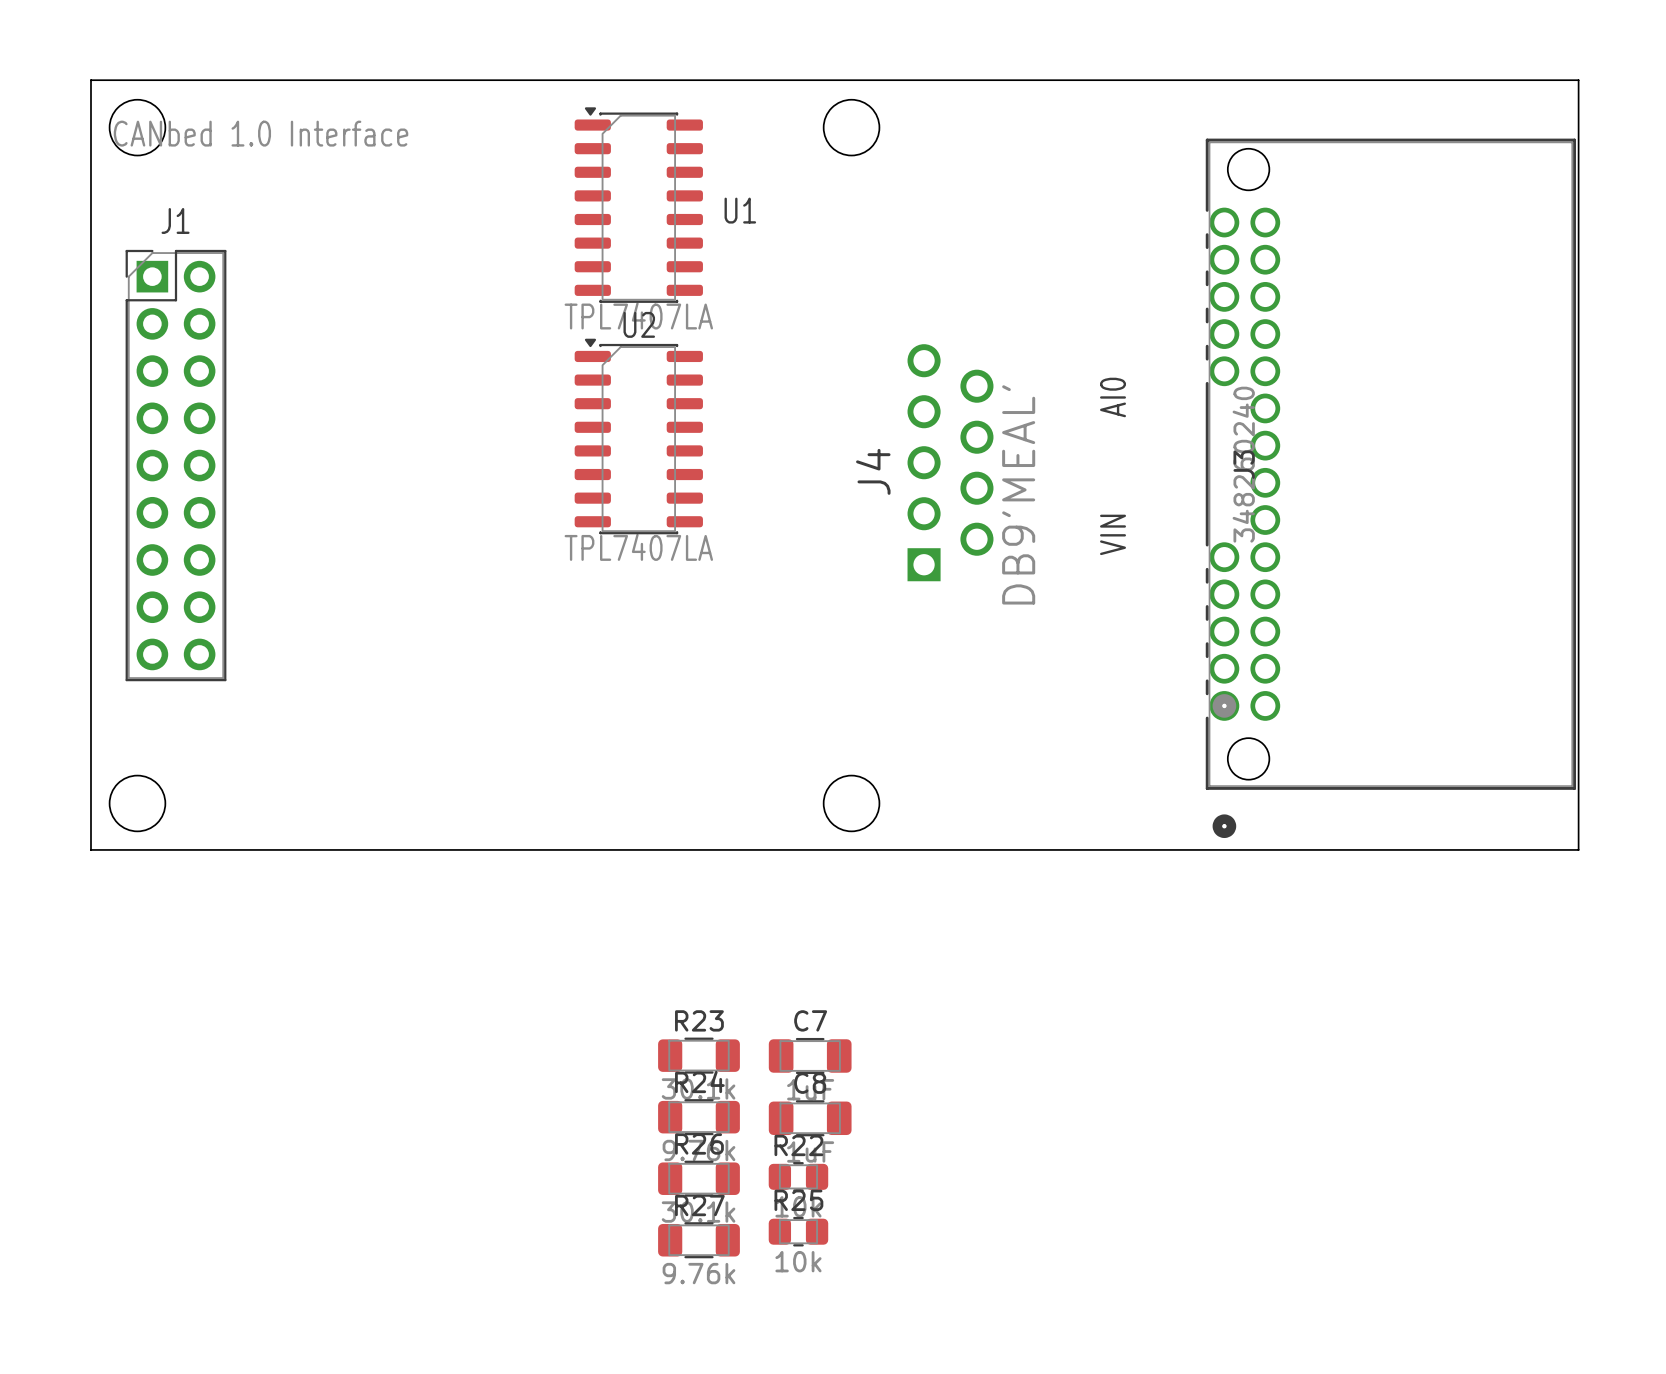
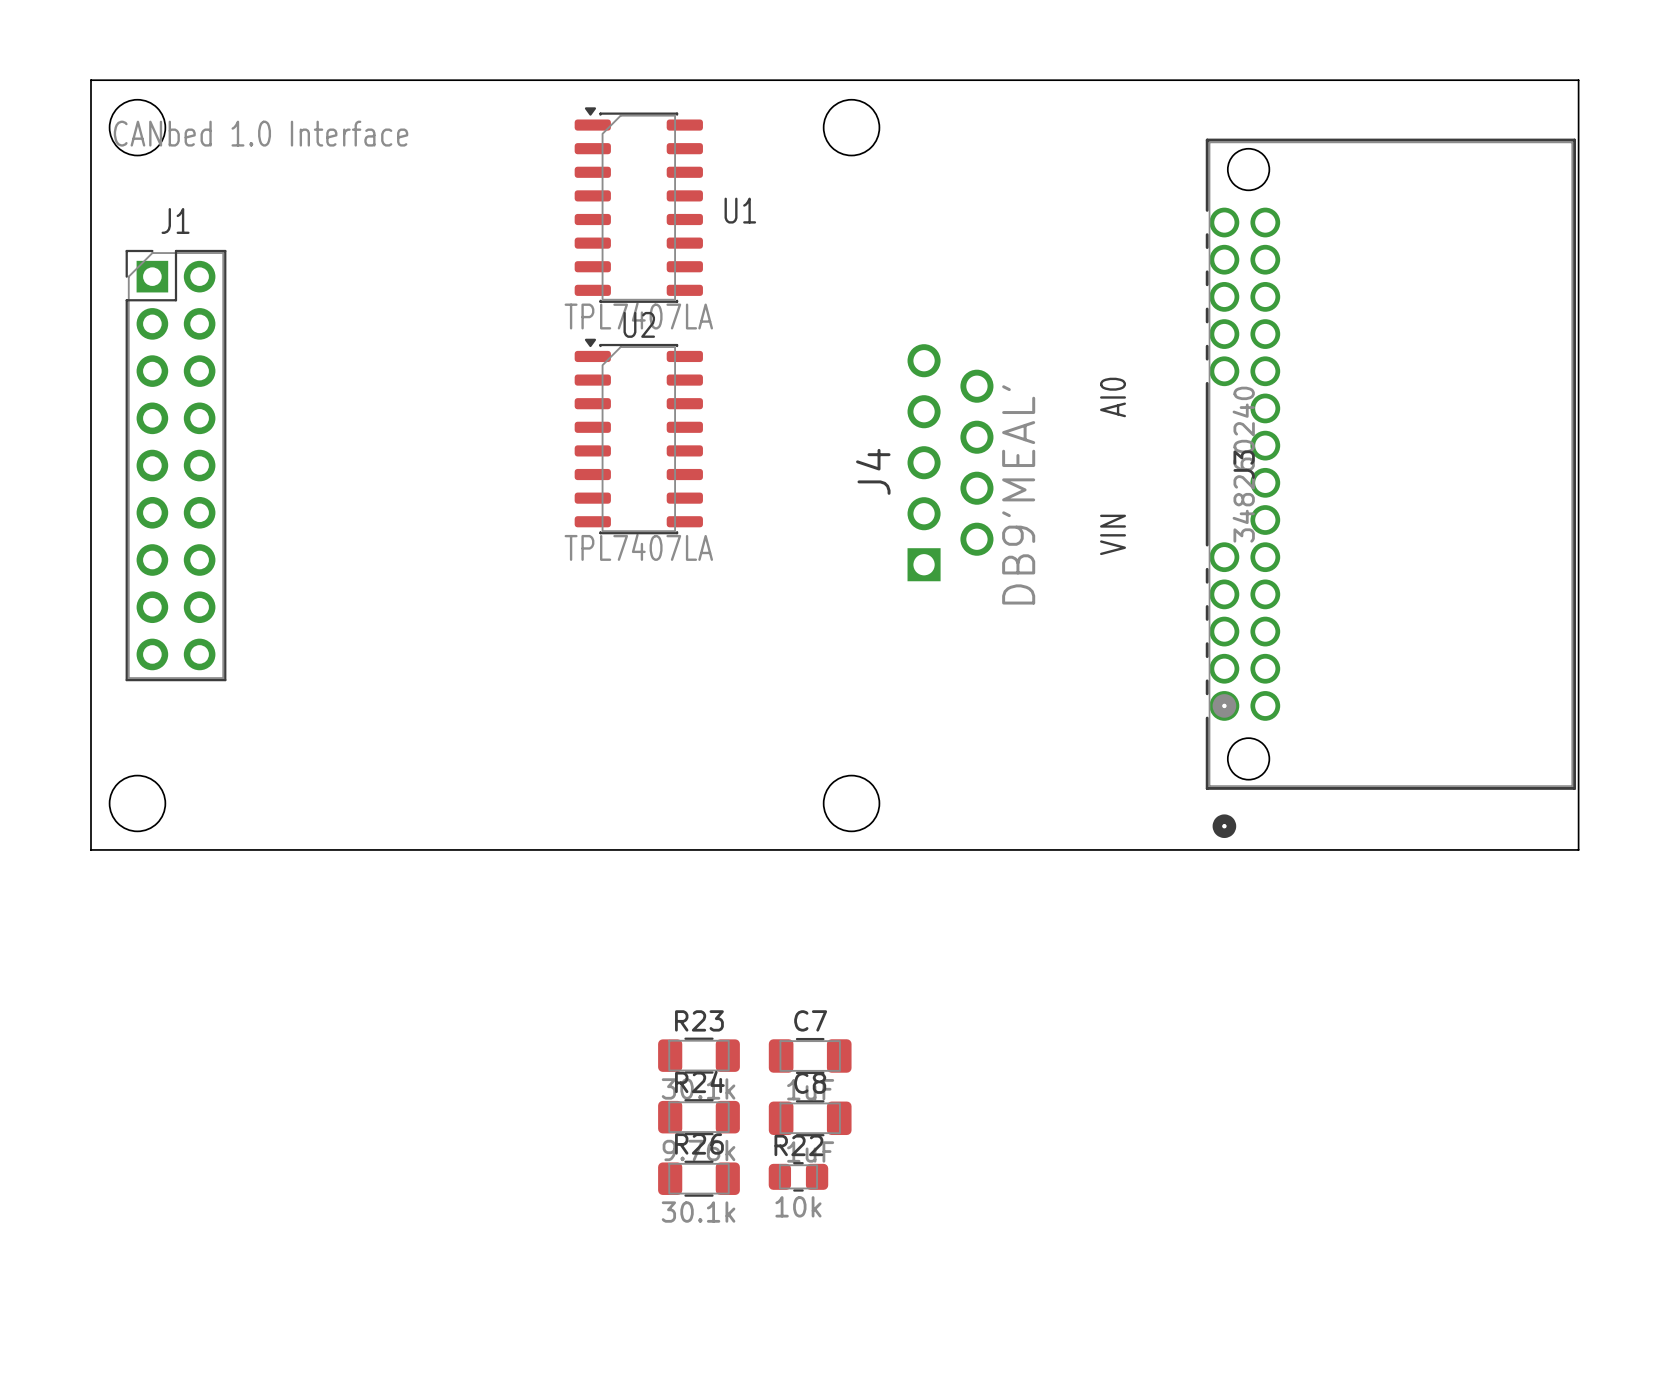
R25: 10k (798, 1231) -> none
R27: 9.76k (698, 1240) -> none

